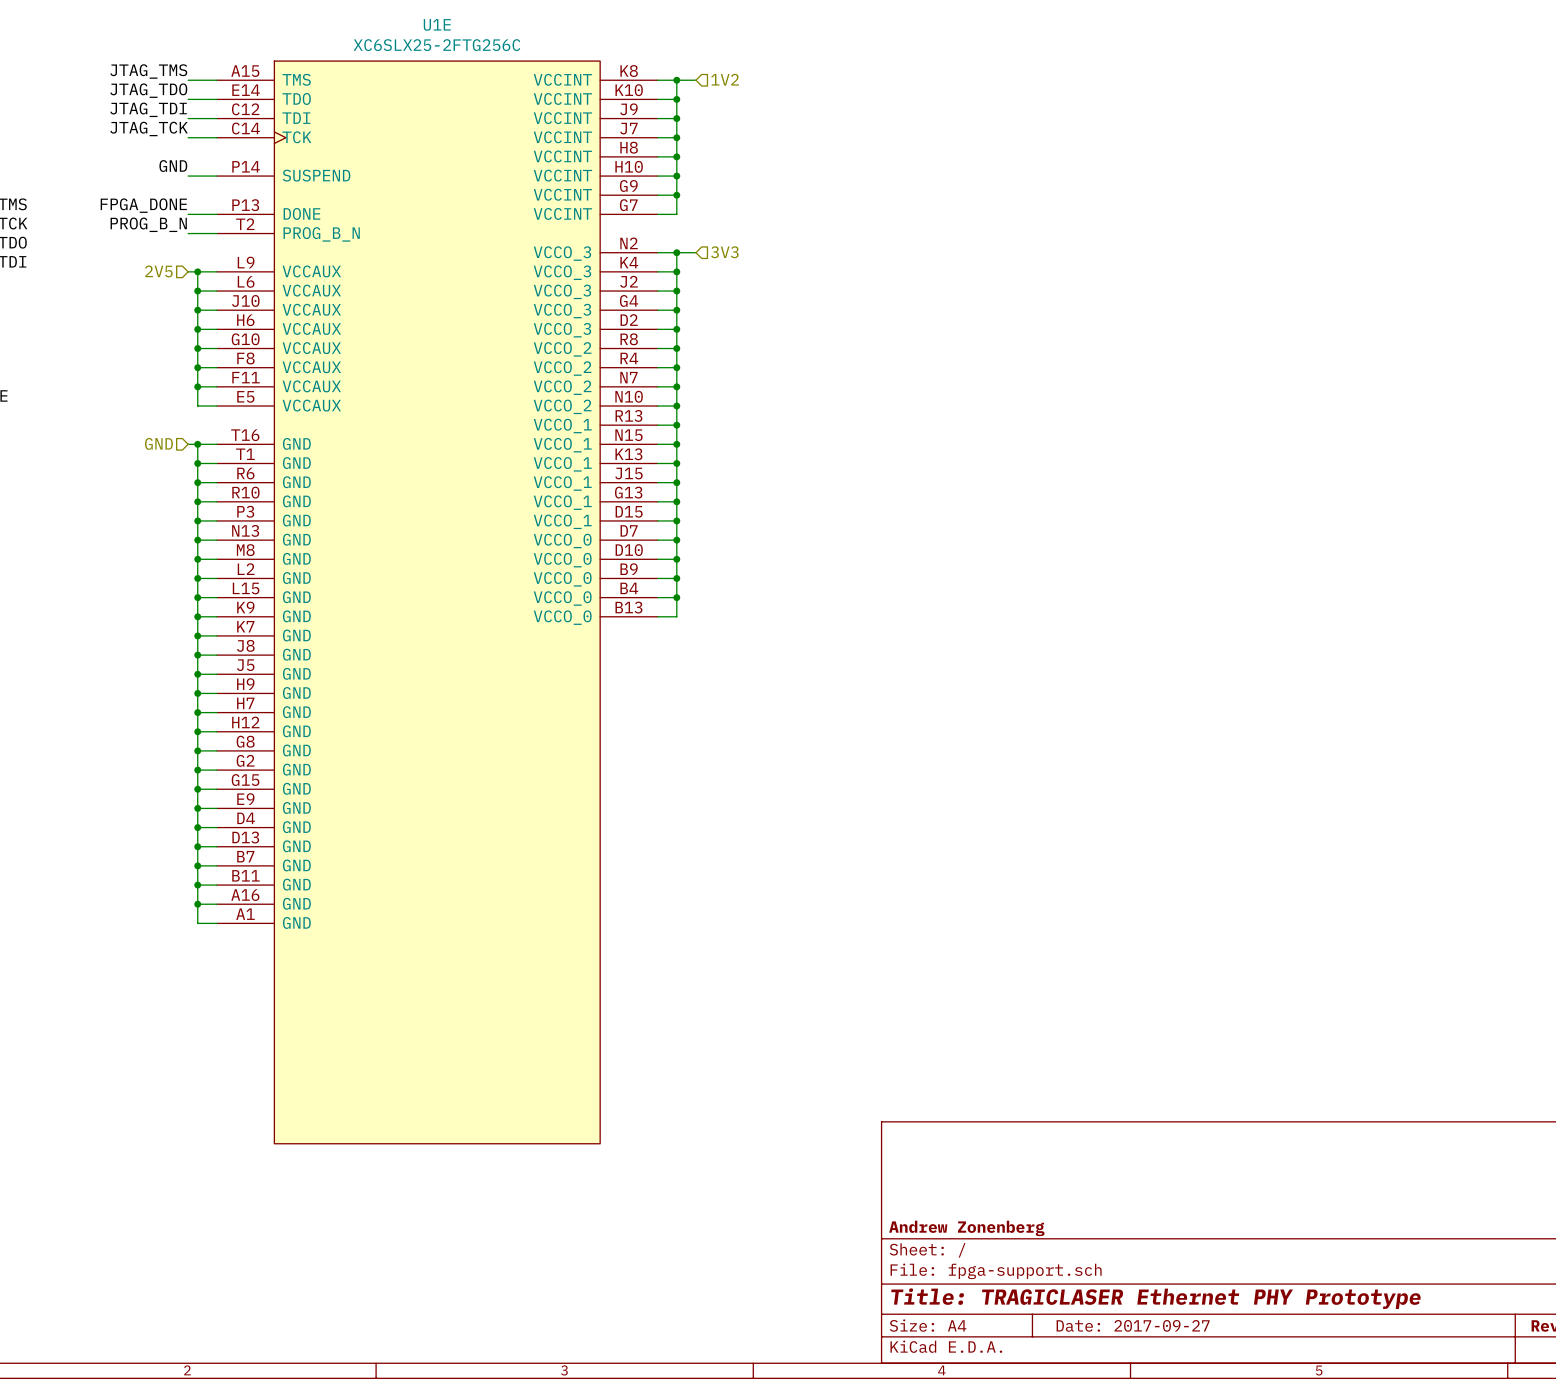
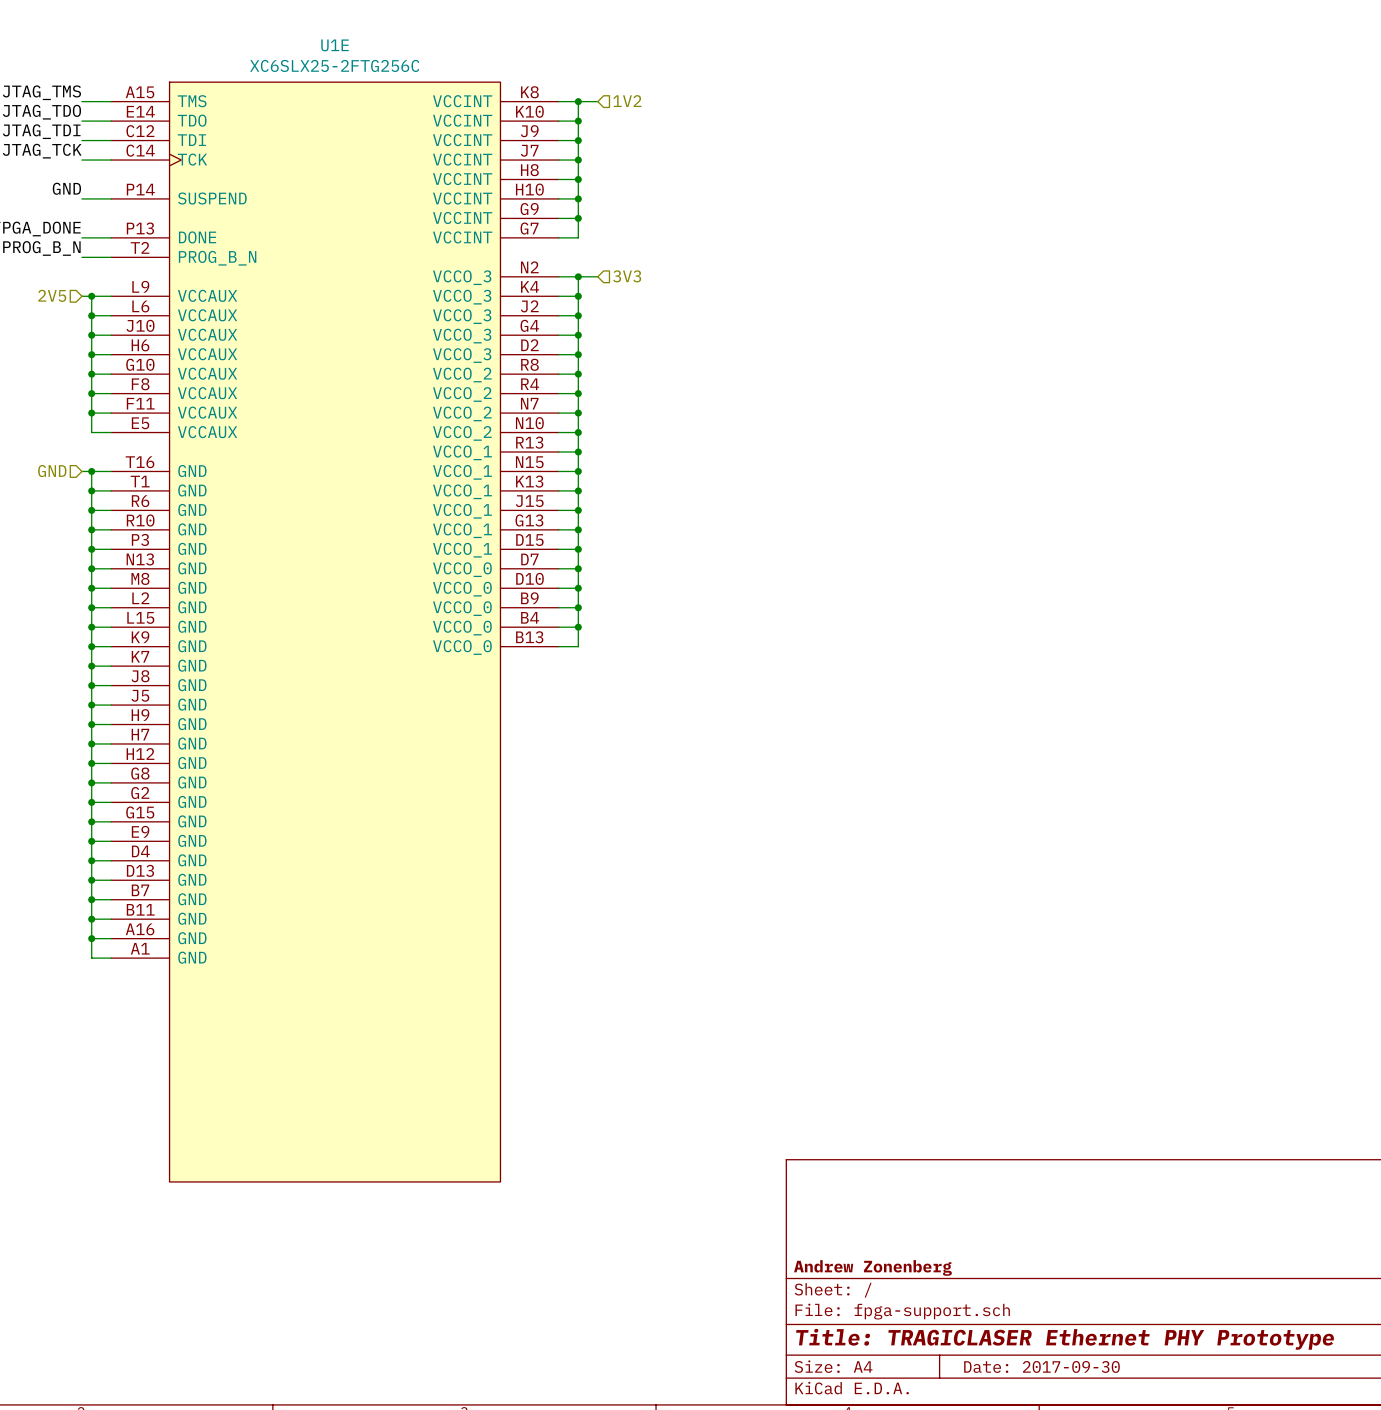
title block: Date: 2017-09-27 (1133, 1325) -> Date: 2017-09-30 (1041, 1366)

